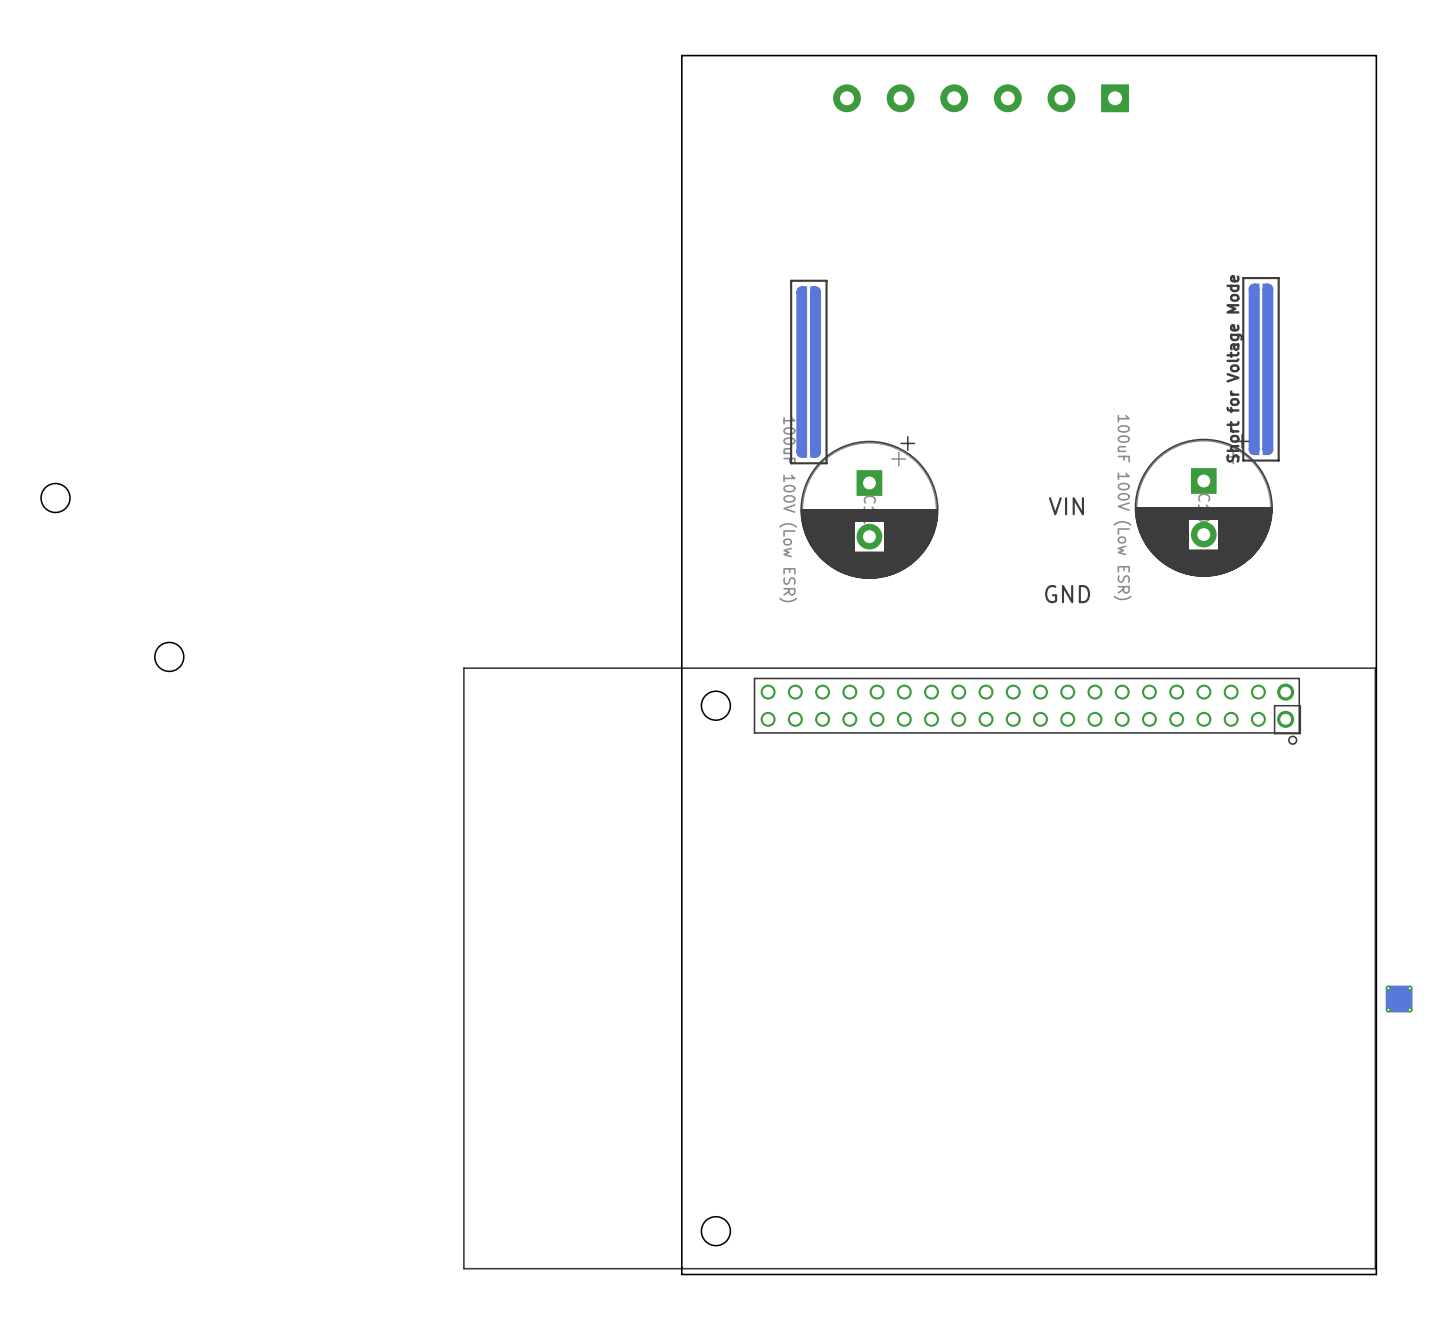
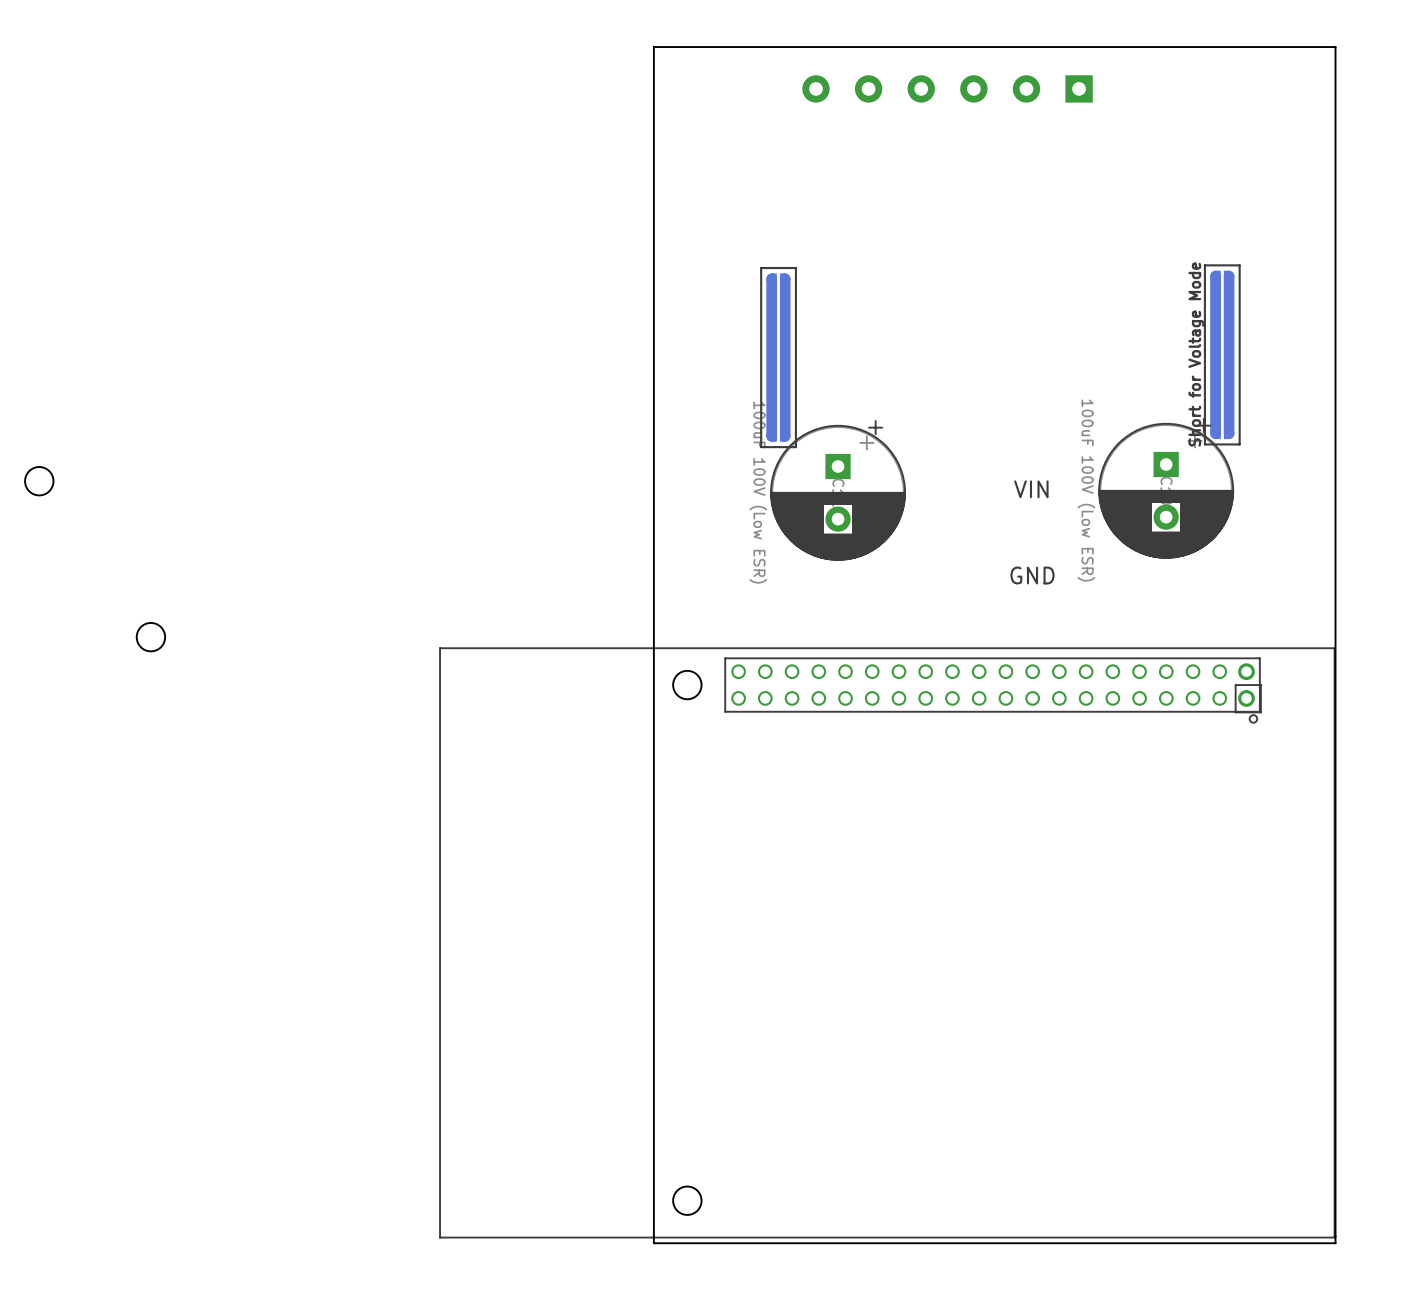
part: (1399, 999) -> none

